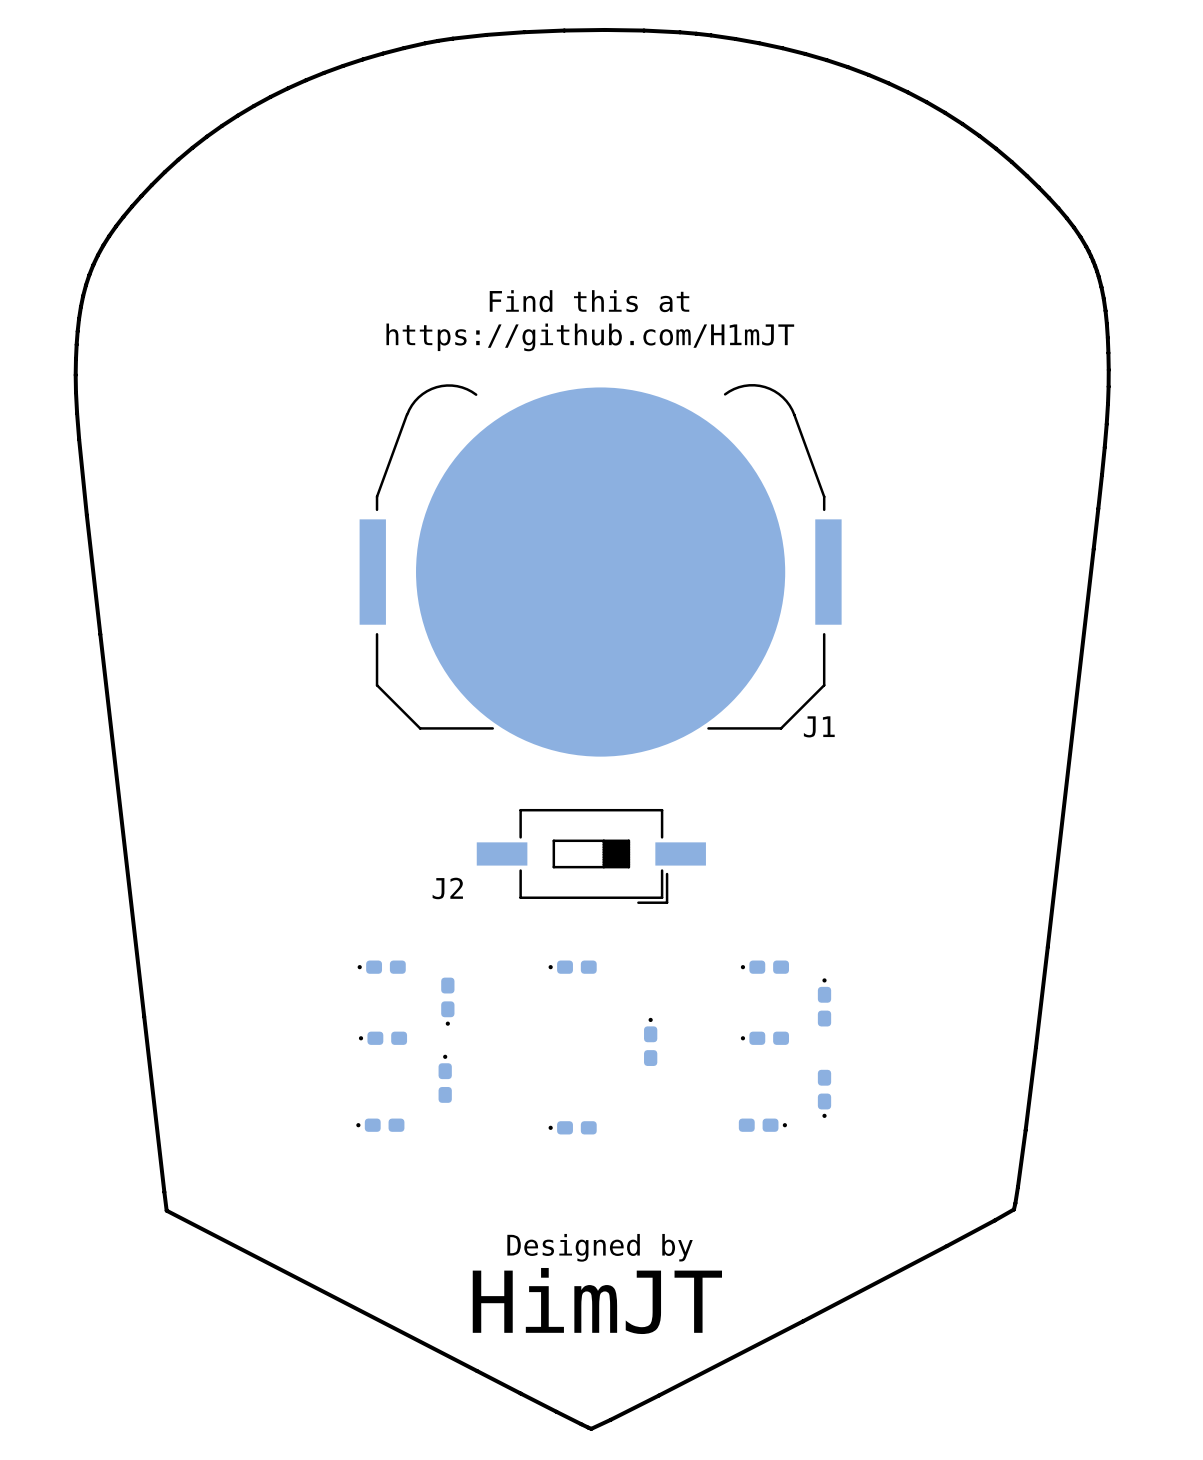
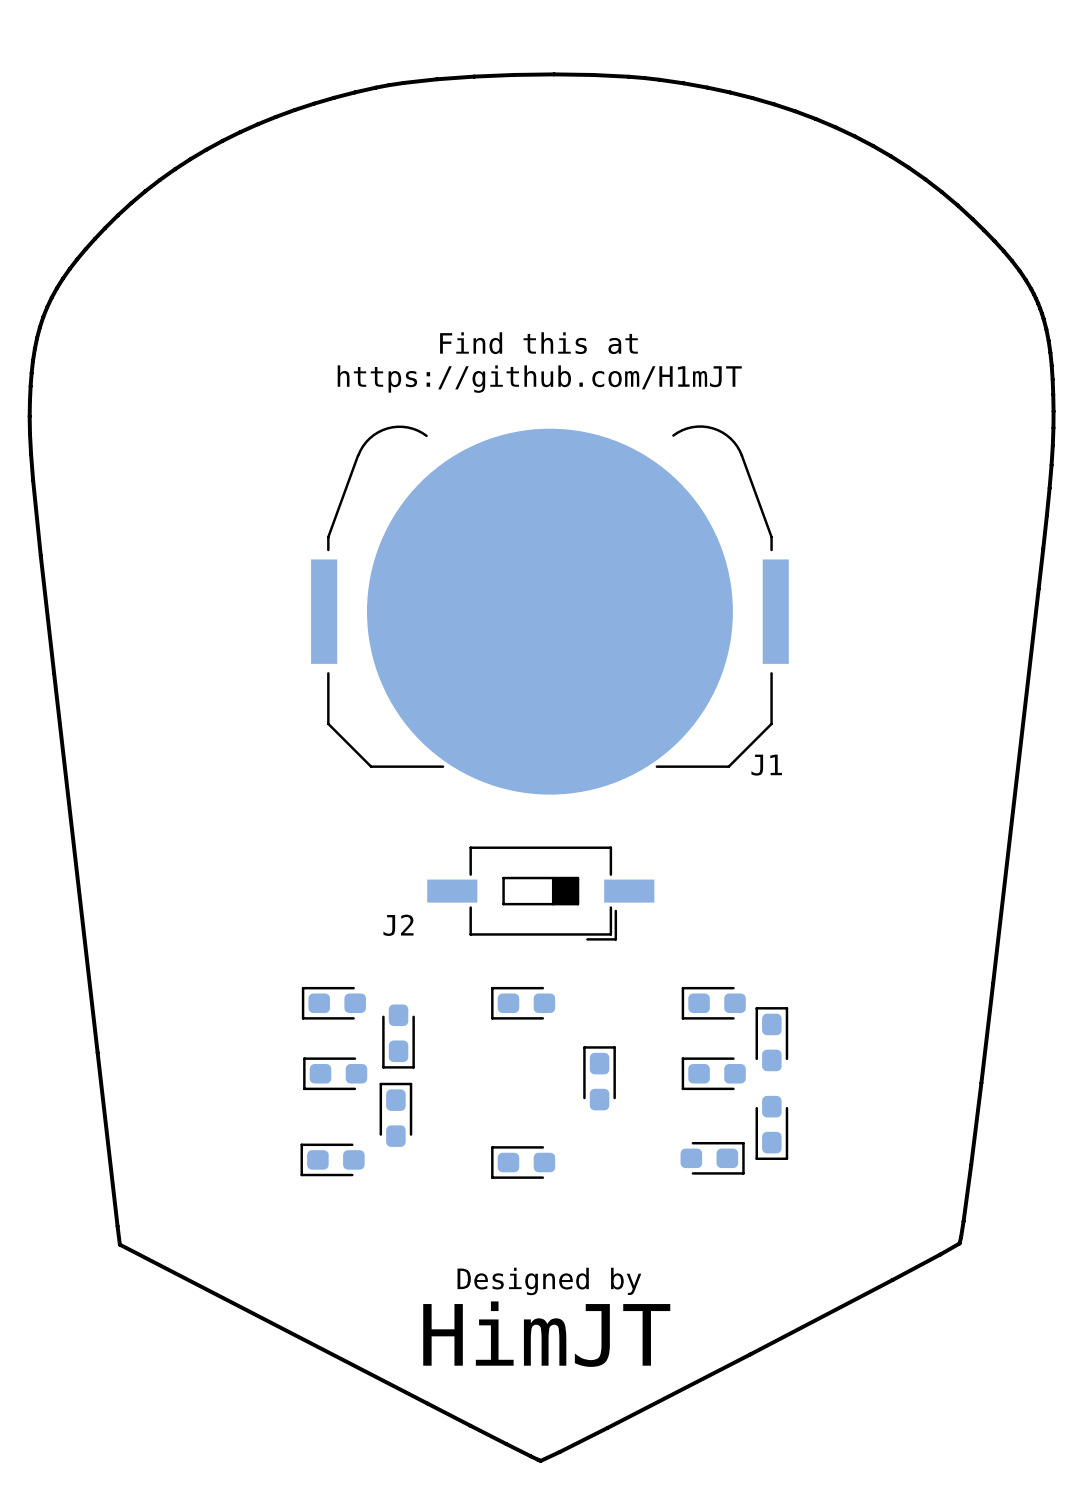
part footprint: [357, 960, 406, 974] -> [301, 986, 366, 1020]
part footprint: [548, 960, 597, 974] -> [491, 986, 556, 1020]
part footprint: [740, 960, 789, 974] -> [681, 986, 746, 1020]
part footprint: [441, 977, 455, 1026] -> [382, 1004, 415, 1069]
part footprint: [817, 978, 832, 1027] -> [755, 1007, 789, 1072]
part footprint: [644, 1017, 658, 1066] -> [583, 1046, 616, 1111]
part footprint: [358, 1031, 408, 1045] -> [303, 1057, 368, 1091]
part footprint: [740, 1031, 789, 1045] -> [681, 1057, 746, 1091]
part footprint: [438, 1054, 452, 1103] -> [379, 1082, 413, 1147]
part footprint: [817, 1069, 832, 1118] -> [755, 1095, 789, 1161]
part footprint: [356, 1118, 405, 1132] -> [300, 1143, 365, 1177]
part footprint: [738, 1118, 787, 1132] -> [680, 1141, 745, 1175]
part footprint: [548, 1121, 597, 1135] -> [491, 1146, 556, 1179]

